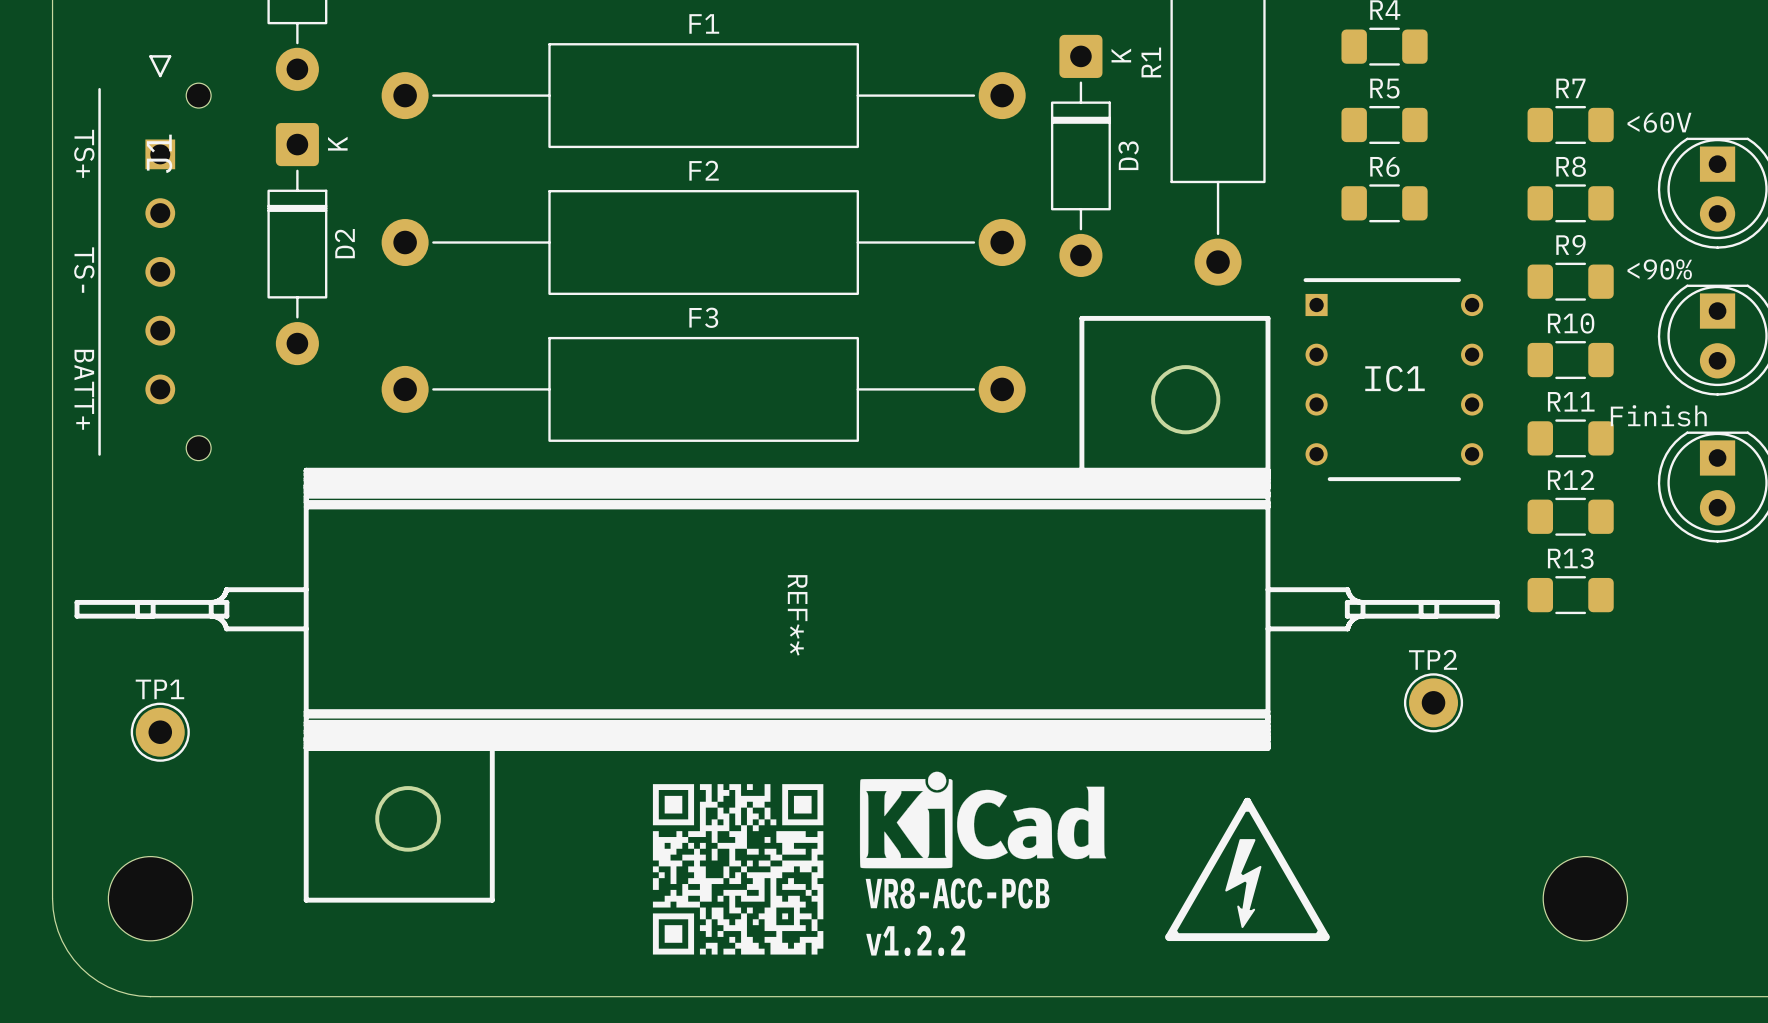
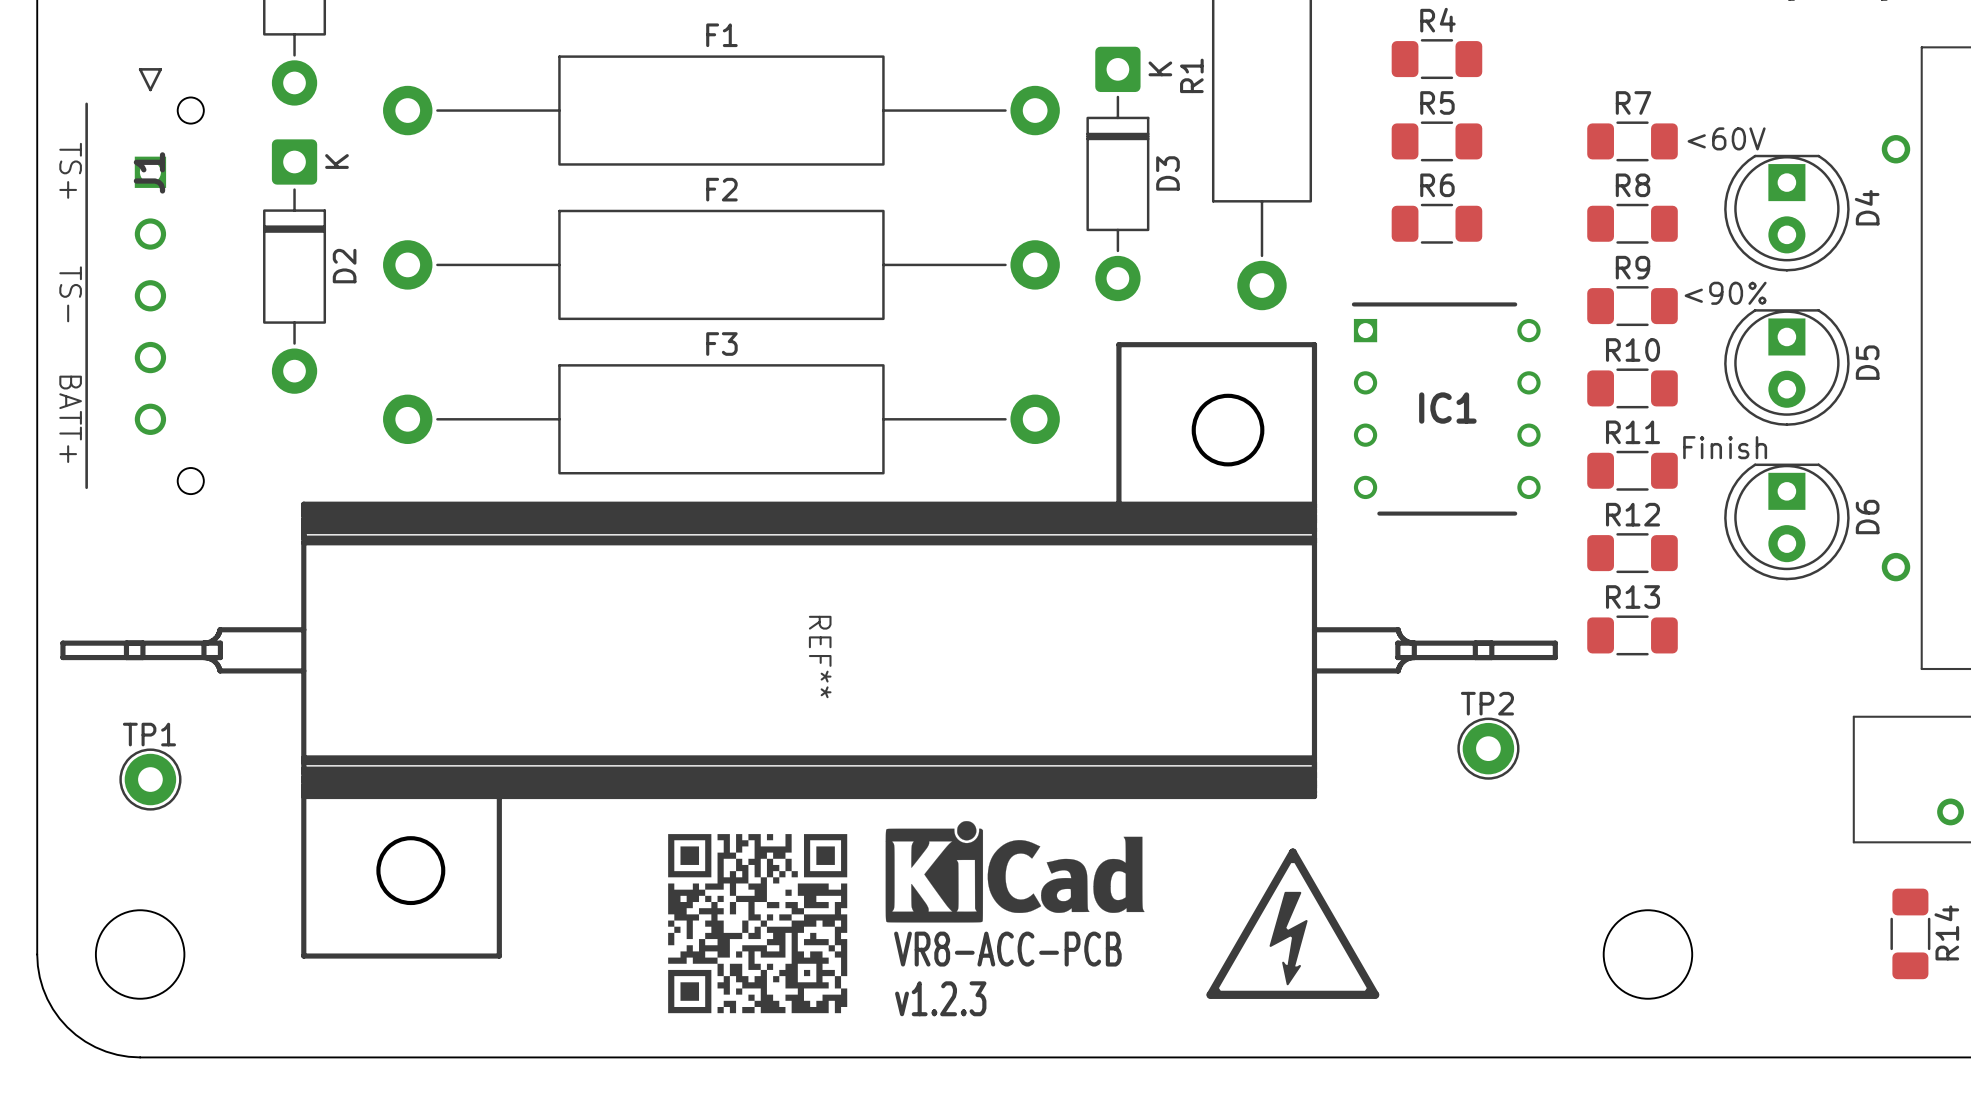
text: v1.2.2 (915, 940) -> v1.2.3 (940, 998)

